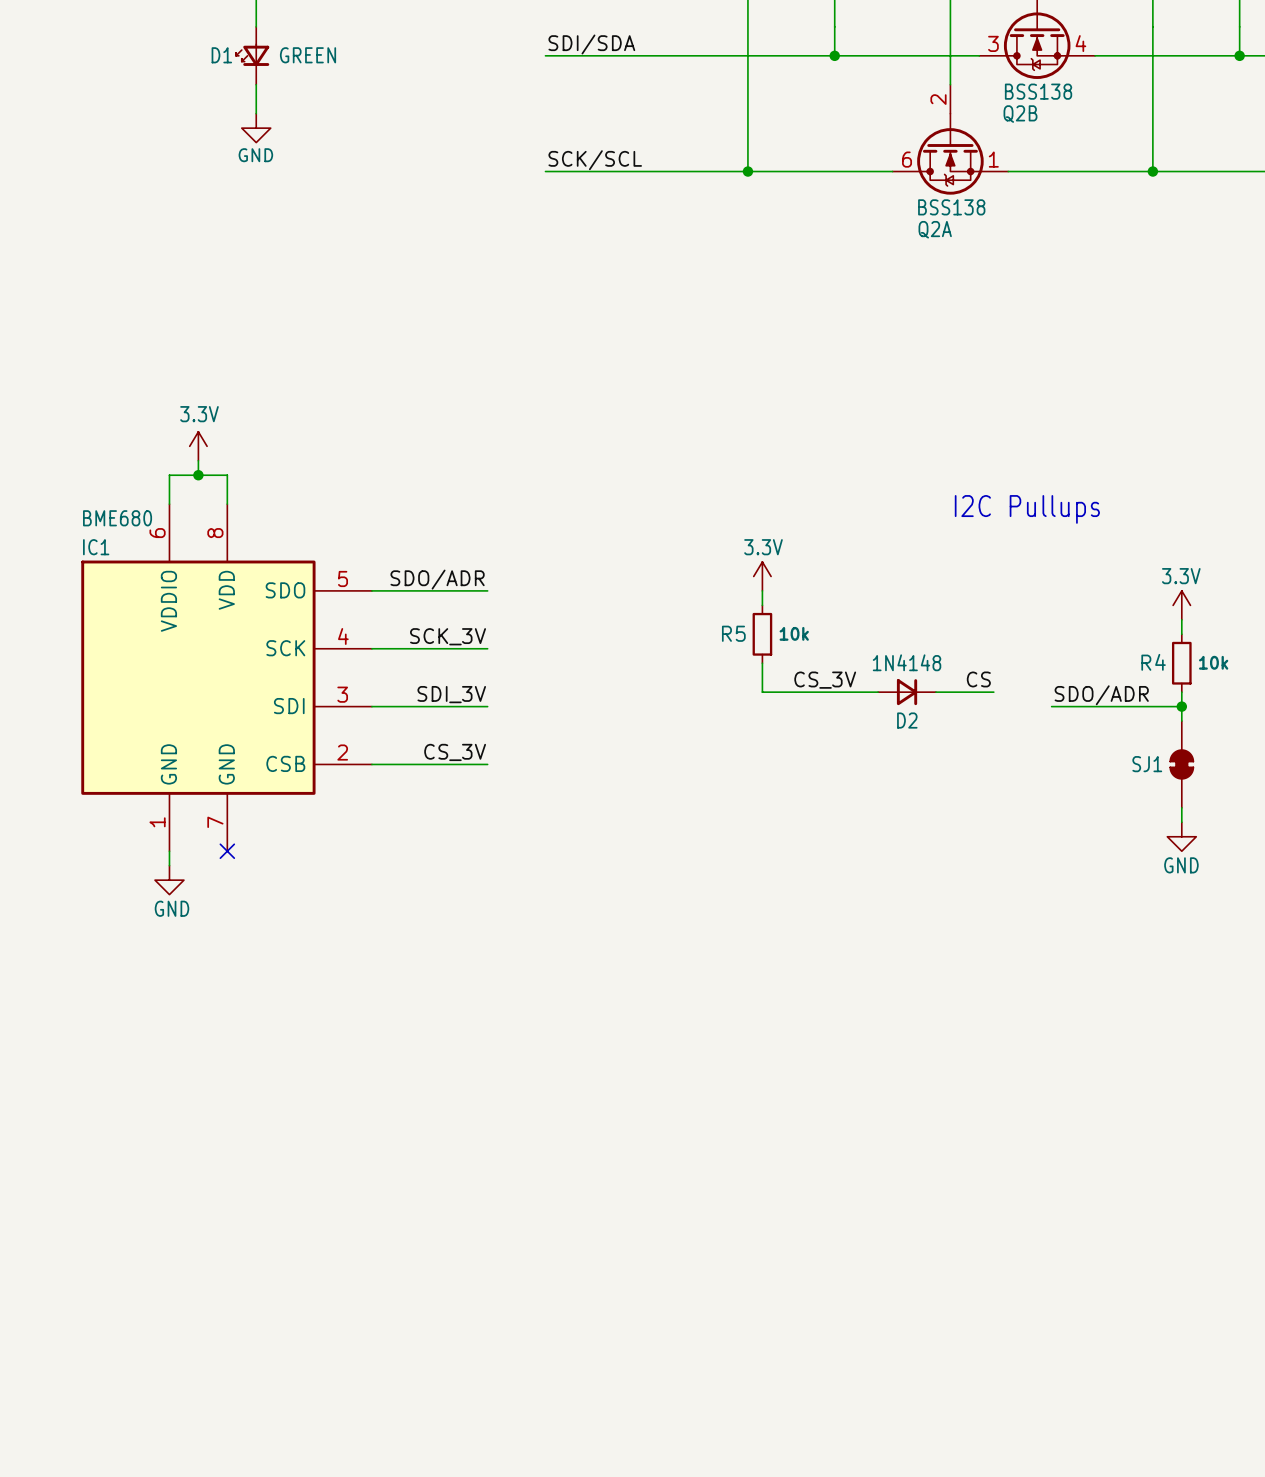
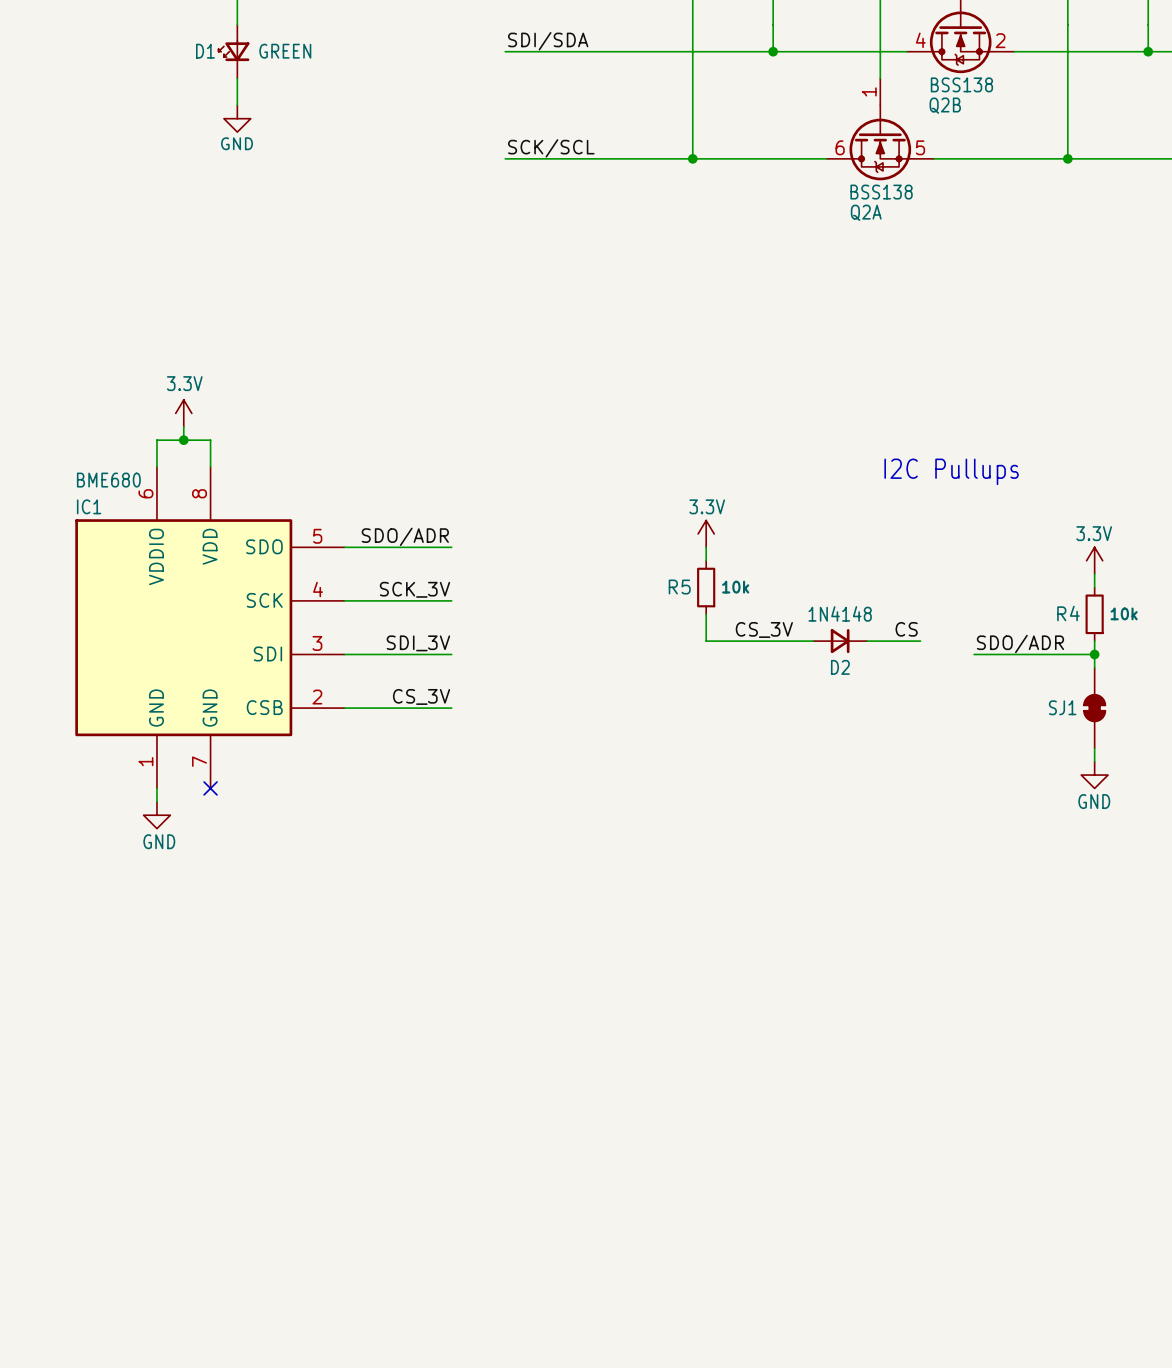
Q2B pin number: 3 (993, 43) -> 4 (920, 40)
Q2B pin number: 4 (1080, 43) -> 2 (1000, 40)
Q2A pin number: 2 (938, 99) -> 1 (869, 91)
Q2A pin number: 1 (993, 159) -> 5 (920, 147)

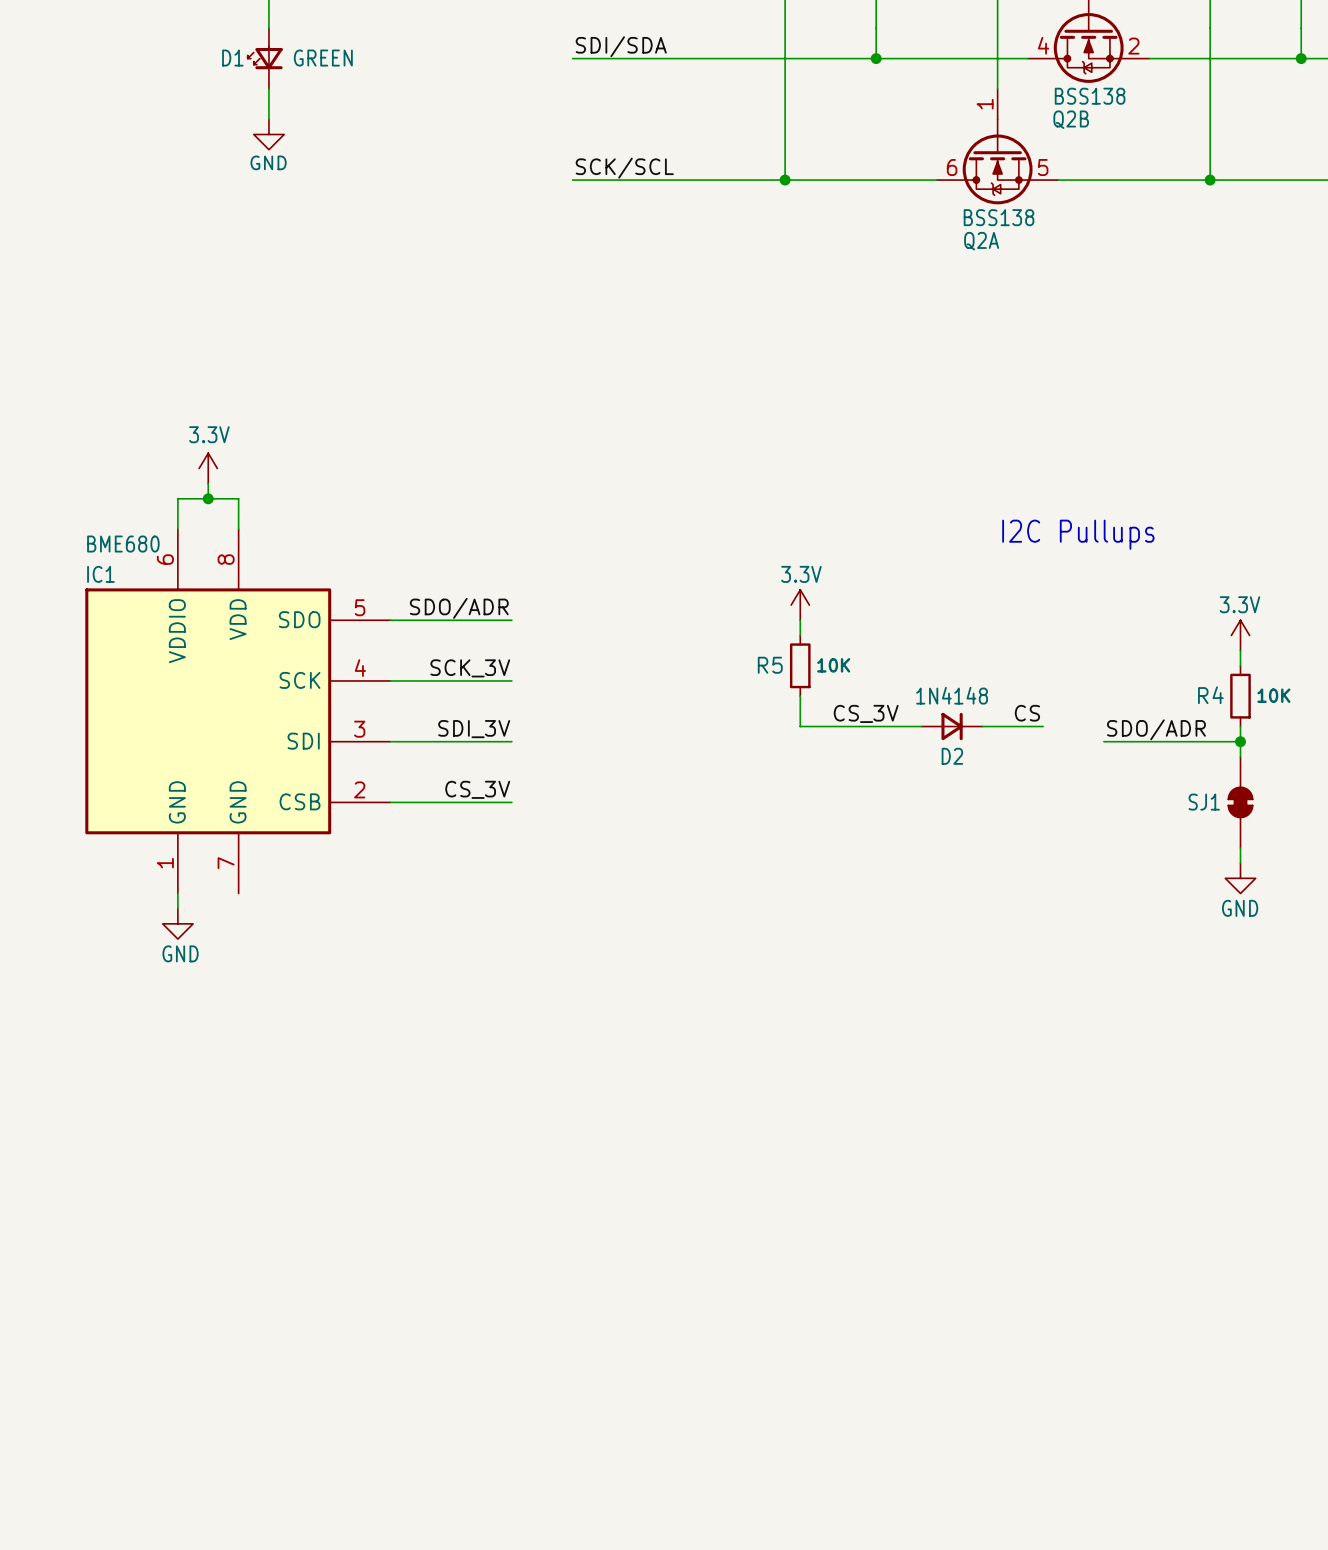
R5 value: 10k (735, 587) -> 10K (833, 665)
R4 value: 10k (1124, 613) -> 10K (1273, 695)
no-connect mark: (210, 788) -> none

